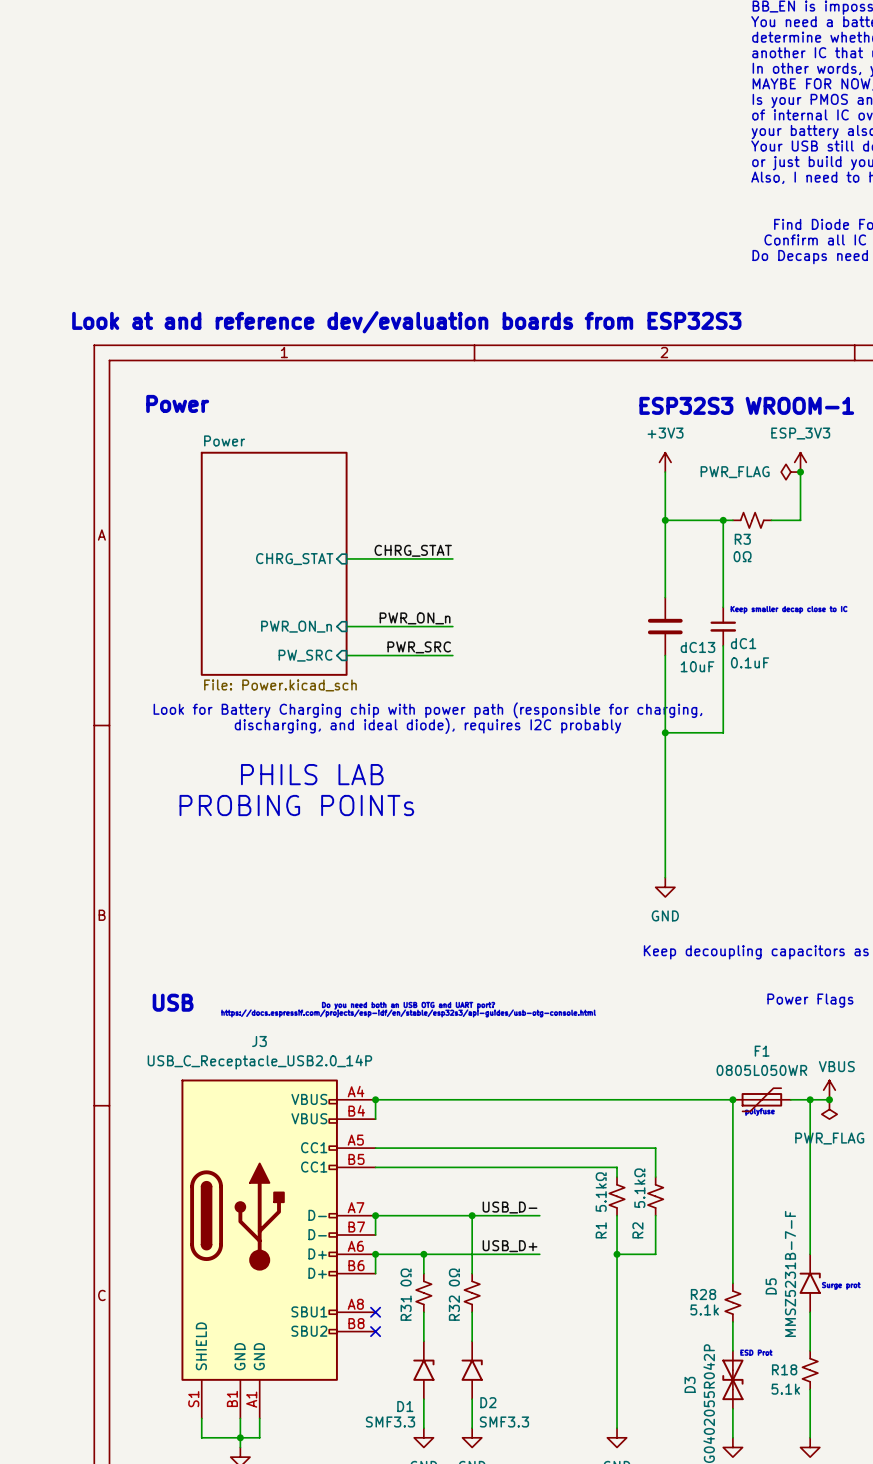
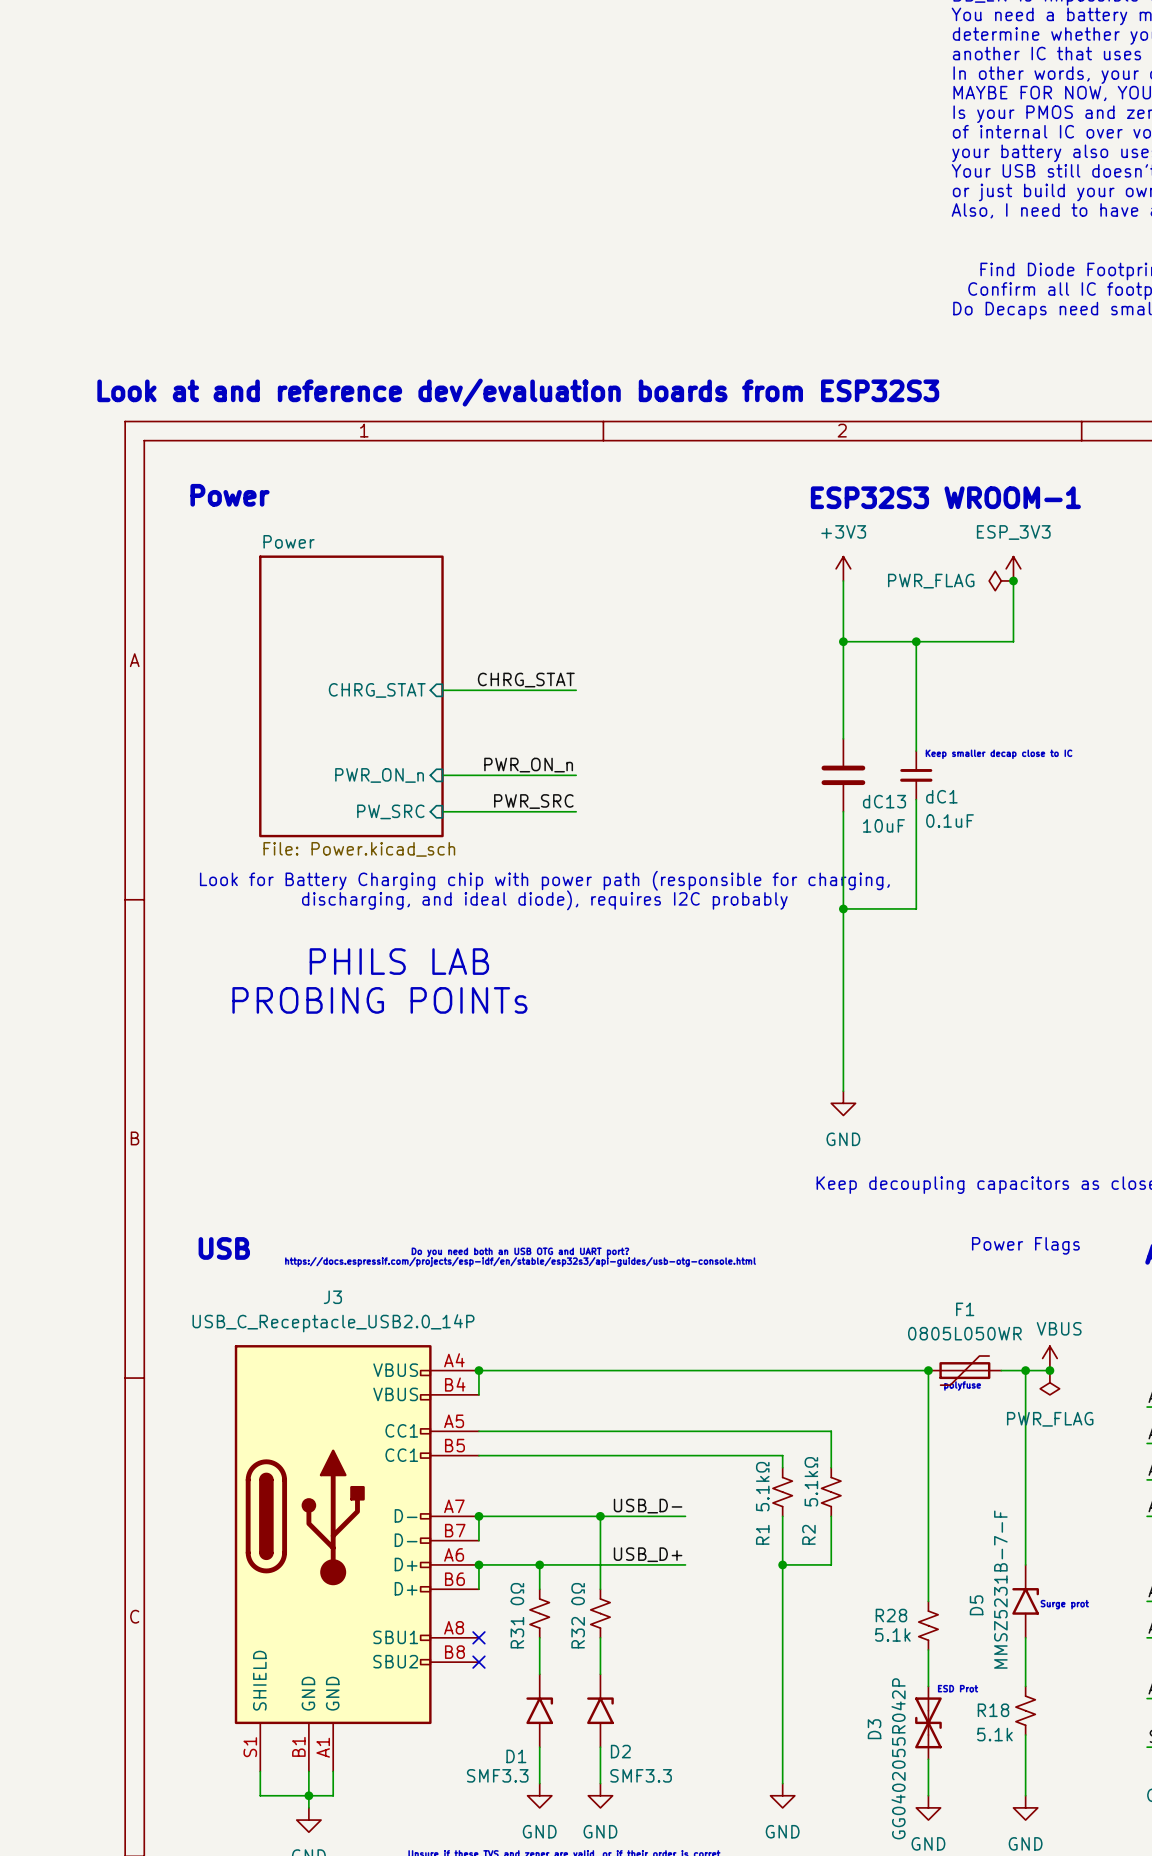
R3: 0Ω (752, 520) -> none

